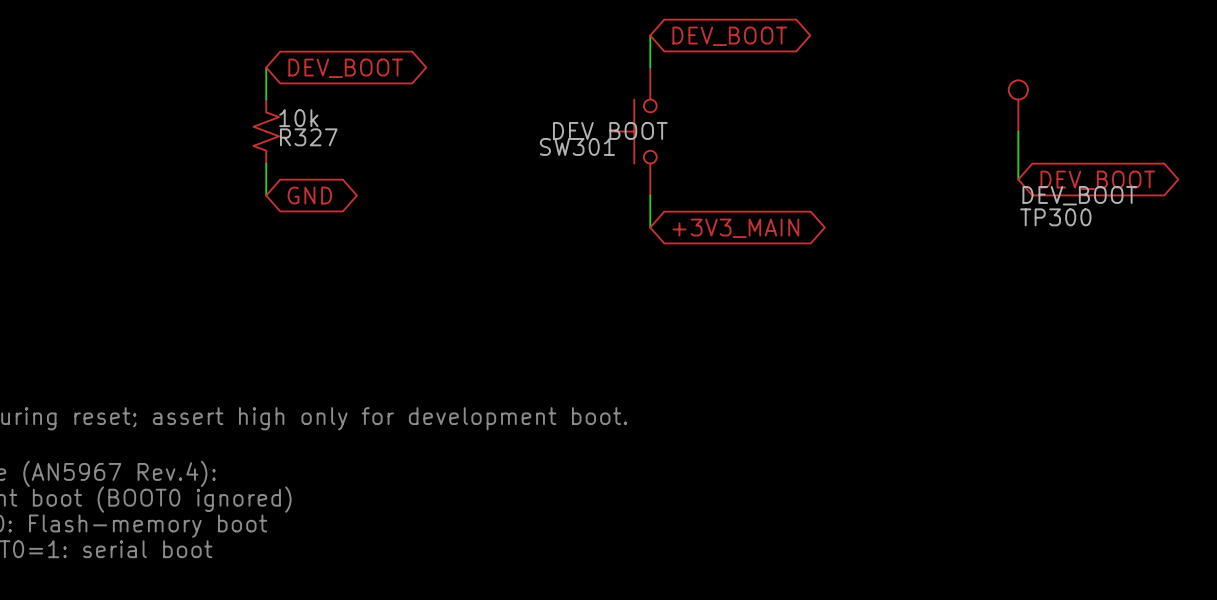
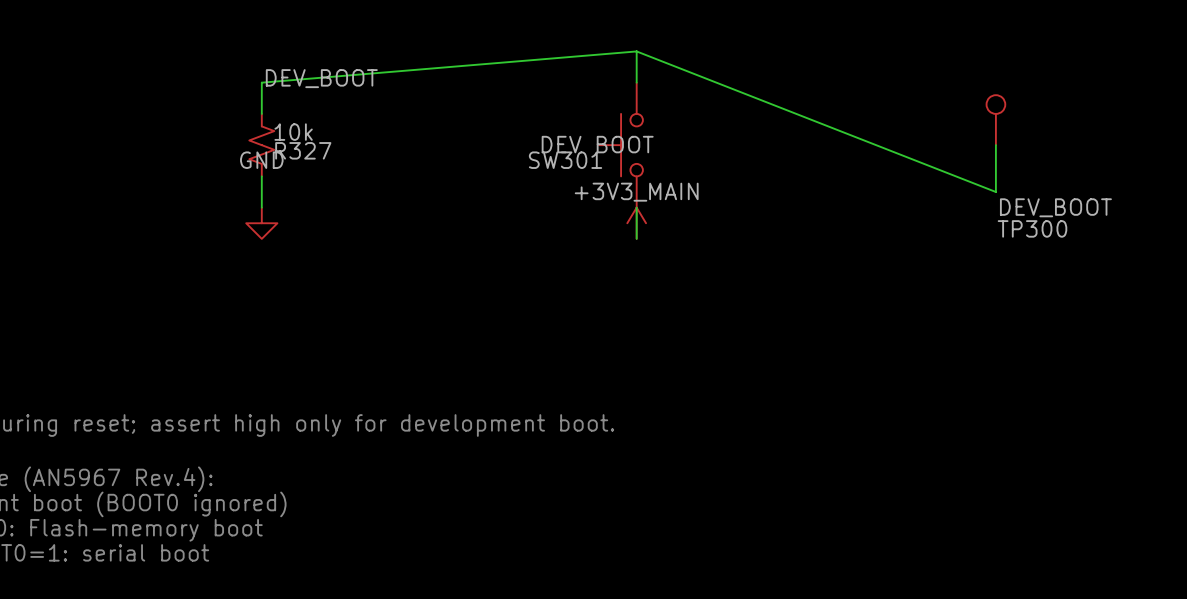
global label: DEV_BOOT (729, 36) -> none
label: none -> DEV_BOOT (321, 78)
wire: none -> (261, 82) (636, 51) (995, 192)
global label: DEV_BOOT (345, 68) -> none
global label: DEV_BOOT (1097, 180) -> none
global label: GND (309, 195) -> none
power symbol: none -> GND (261, 223)
power symbol: none -> +3V3_MAIN (636, 223)
global label: +3V3_MAIN (735, 228) -> none

